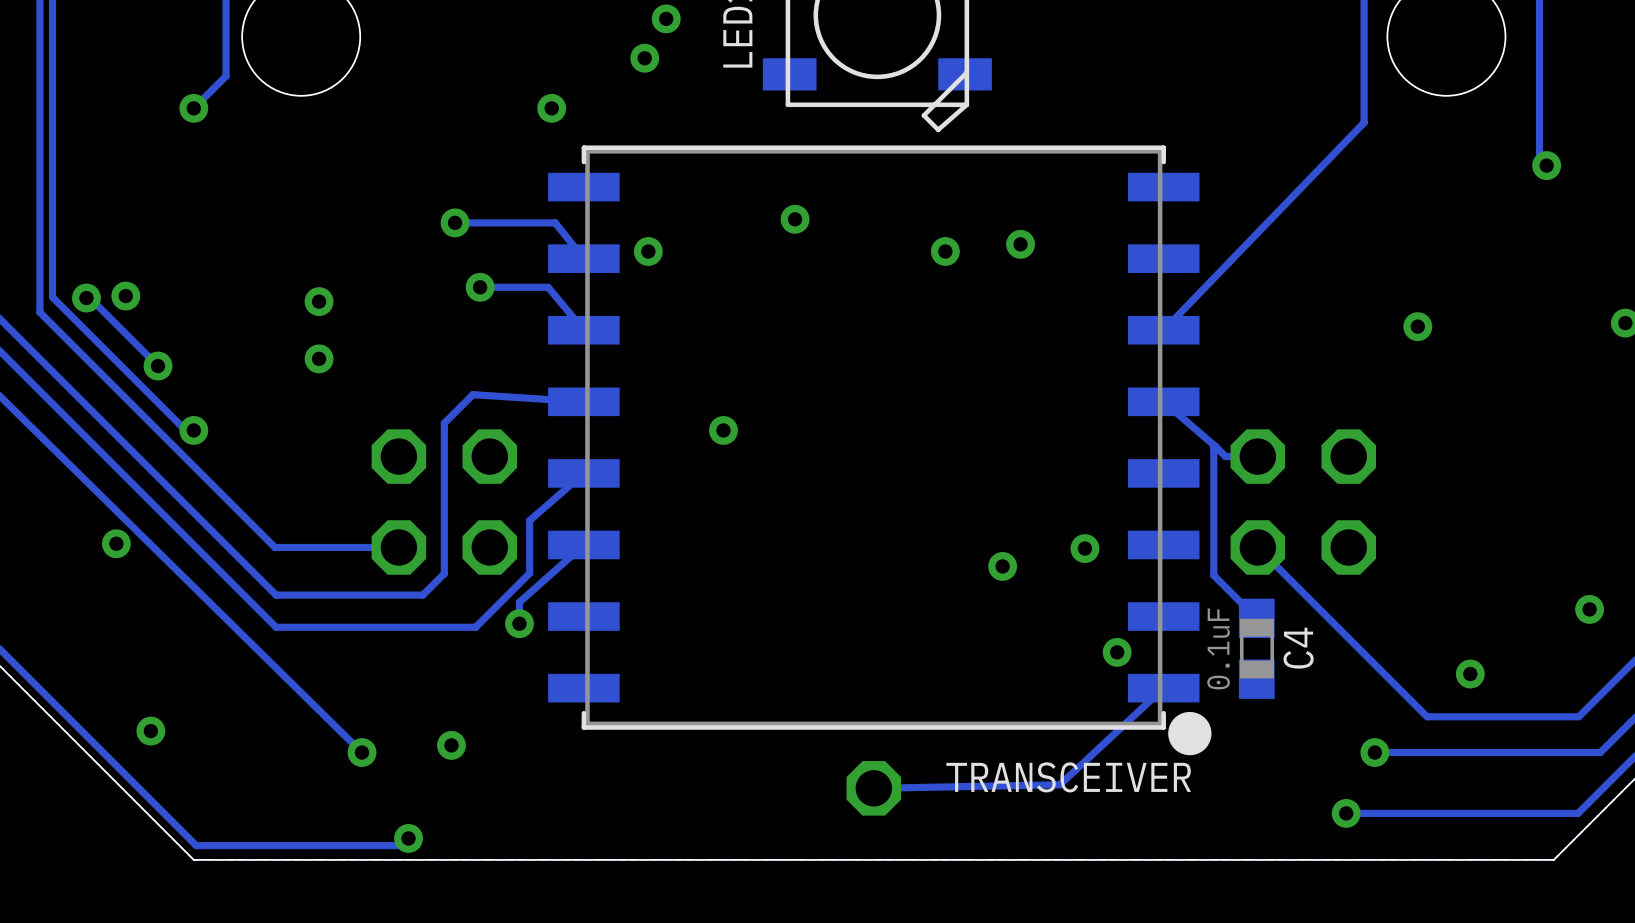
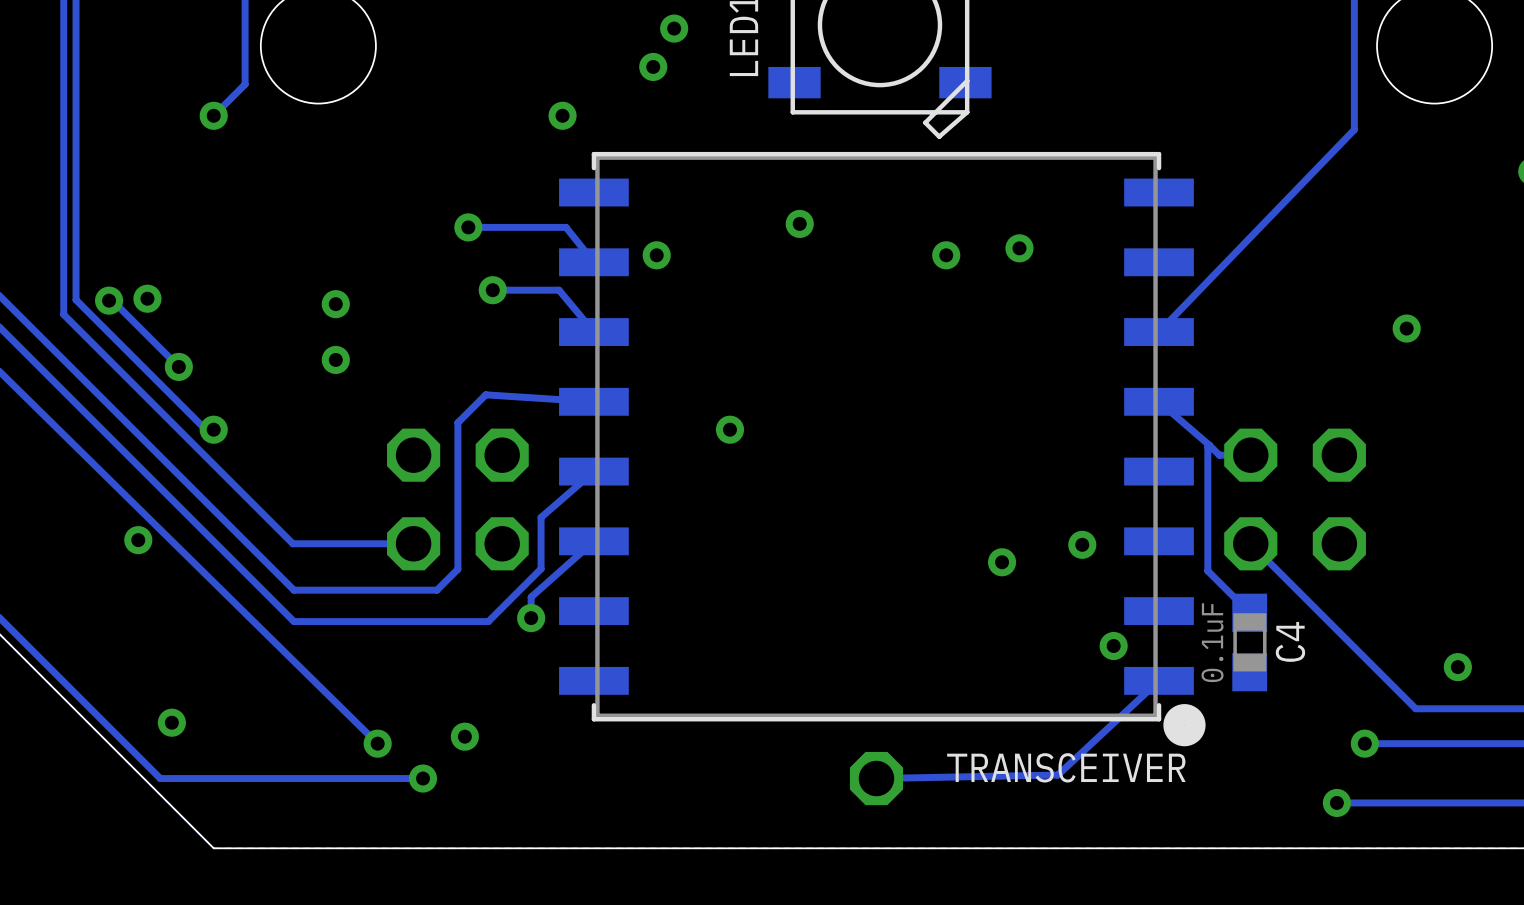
track: (139, 788) (196, 845) (401, 845) (408, 838) -> (160, 778) (423, 778)
via position: (408, 838) -> (423, 778)

